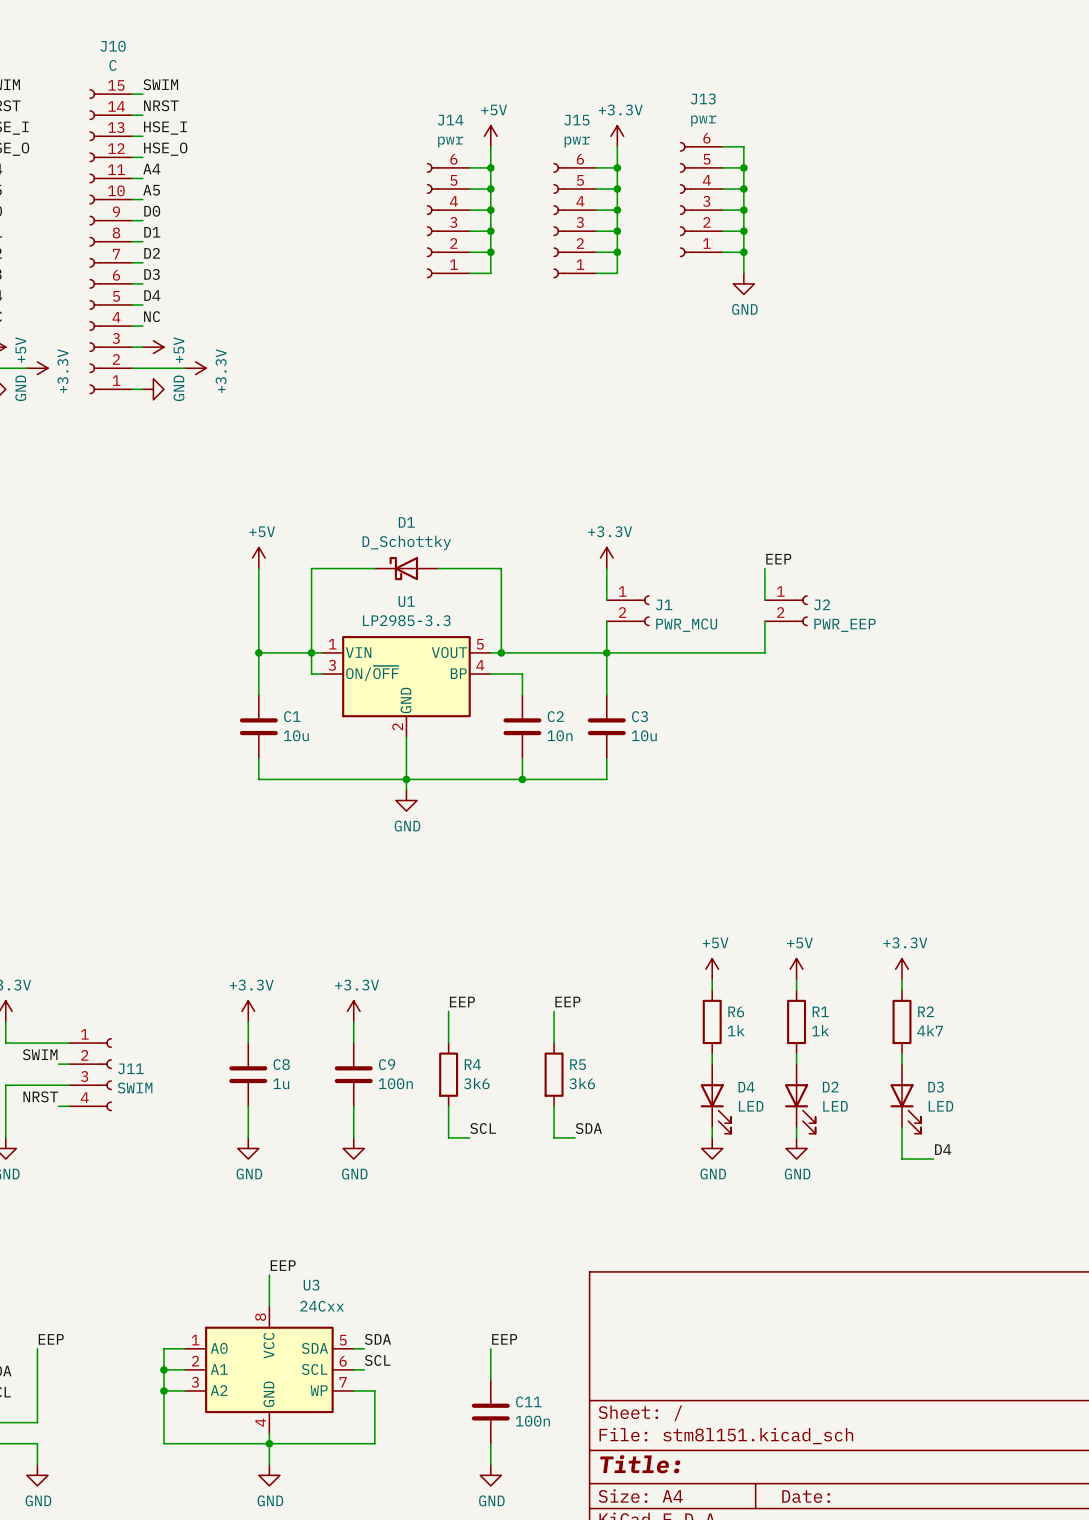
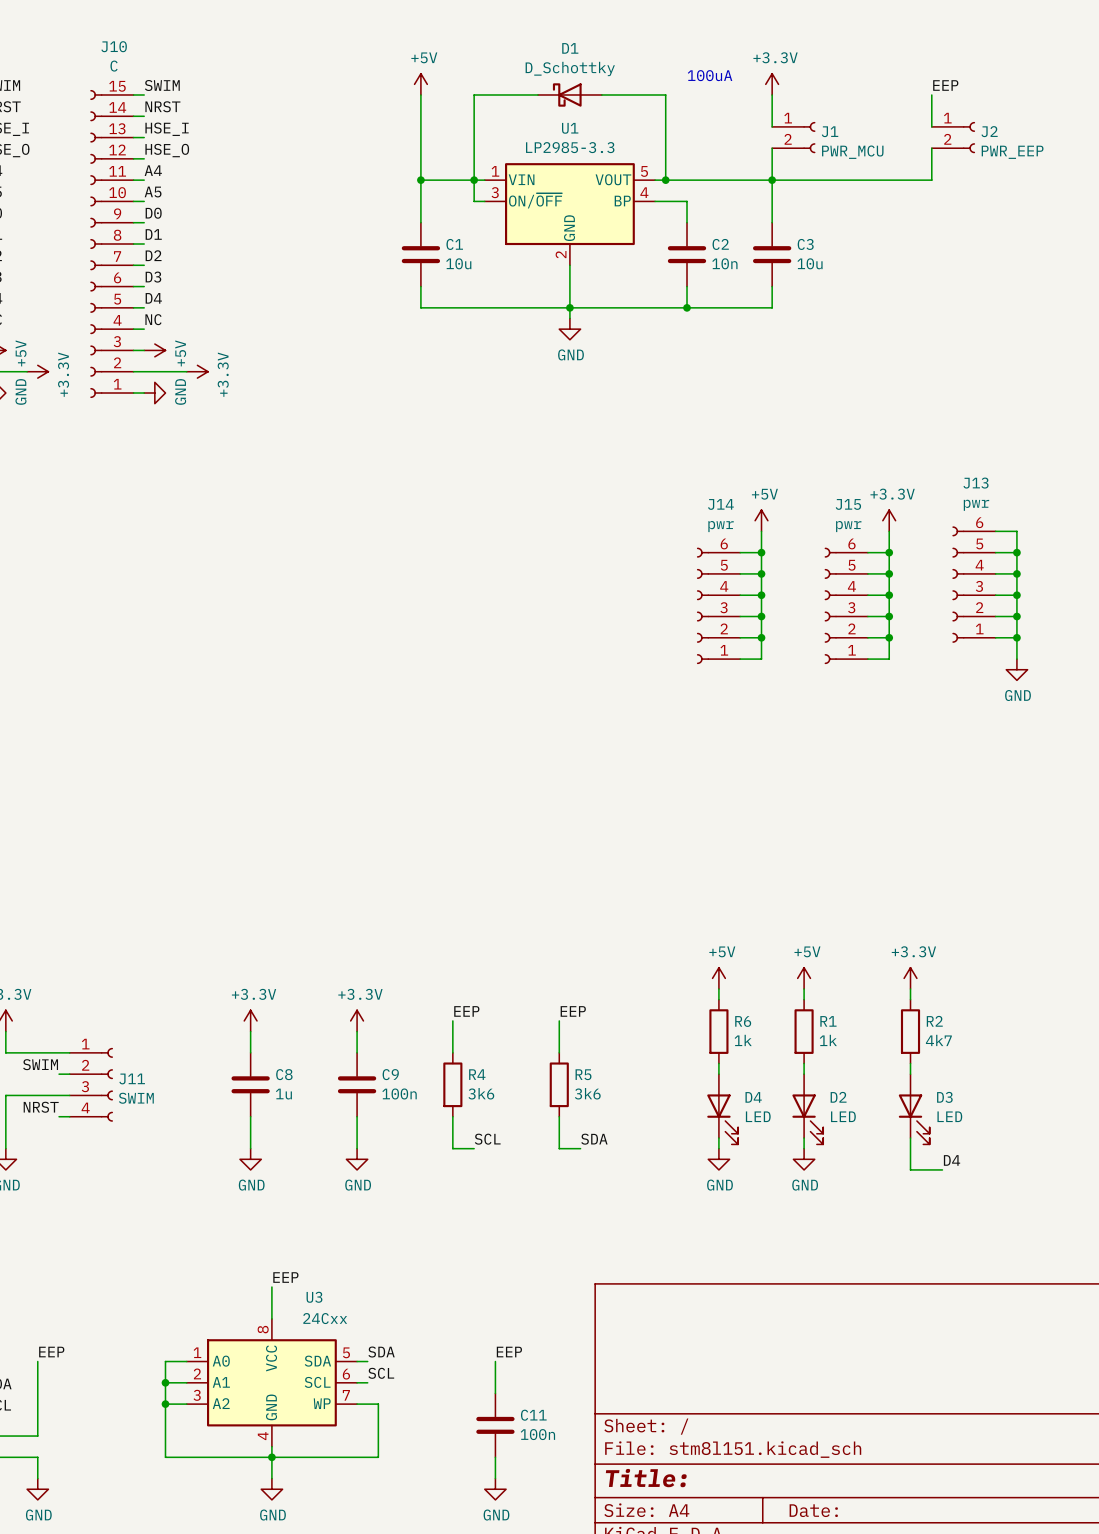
text: none -> 100uA (710, 75)
label: none -> EEP (945, 85)
wire: none -> (420, 94) (420, 222)
wire: none -> (538, 94) (474, 94) (474, 201) (484, 201)
wire: none -> (601, 94) (665, 94) (665, 180)
wire: none -> (772, 94) (772, 126)
wire: none -> (931, 94) (931, 126)
power symbol position: +5V (490, 136) -> +5V (420, 84)
power symbol position: +3.3V (617, 136) -> +3.3V (772, 84)
wire: (490, 146) (490, 273) (469, 273) -> none
wire: (617, 146) (617, 273) (596, 273) -> none
wire: (722, 146) (743, 146) (743, 273) -> none
wire: none -> (772, 148) (772, 222)
wire: none -> (931, 148) (931, 180) (655, 180)
wire: (469, 167) (490, 167) -> none
junction: (490, 167) -> none
junction: (617, 167) -> none
wire: (722, 167) (743, 167) -> none
junction: (743, 167) -> none
wire: none -> (420, 180) (484, 180)
junction: none -> (420, 180)
junction: none -> (474, 180)
junction: none -> (665, 180)
junction: none -> (772, 180)
wire: (469, 189) (490, 189) -> none
junction: (490, 189) -> none
junction: (617, 189) -> none
wire: (722, 189) (743, 189) -> none
junction: (743, 189) -> none
wire: none -> (655, 201) (687, 201) (687, 222)
J13 position: (701, 199) -> (974, 584)
wire: (469, 210) (490, 210) -> none
junction: (490, 210) -> none
junction: (617, 210) -> none
wire: (722, 210) (743, 210) -> none
junction: (743, 210) -> none
J14 position: (448, 220) -> (718, 605)
J15 position: (574, 220) -> (846, 605)
wire: (469, 231) (490, 231) -> none
junction: (490, 231) -> none
junction: (617, 231) -> none
wire: (722, 231) (743, 231) -> none
junction: (743, 231) -> none
wire: (469, 252) (490, 252) -> none
junction: (490, 252) -> none
wire: (596, 252) (617, 252) -> none
junction: (617, 252) -> none
wire: (722, 252) (743, 252) -> none
junction: (743, 252) -> none
wire: none -> (569, 265) (569, 318)
wire: none -> (420, 286) (420, 307) (772, 307) (772, 286)
wire: none -> (687, 286) (687, 307)
power symbol position: GND (743, 283) -> GND (569, 329)
junction: none -> (569, 307)
junction: none -> (687, 307)
power symbol: none -> +5V (761, 520)
power symbol: none -> +3.3V (889, 520)
wire: none -> (889, 531) (889, 659) (867, 659)
wire: none -> (995, 531) (1016, 531) (1016, 659)
wire: none -> (740, 552) (761, 552)
junction: none -> (761, 552)
wire: none -> (867, 552) (889, 552)
junction: none -> (889, 552)
wire: none -> (995, 552) (1016, 552)
junction: none -> (1016, 552)
power symbol: +5V (258, 558) -> none
power symbol: +3.3V (606, 558) -> none
label: EEP (778, 559) -> none
wire: (258, 568) (258, 695) -> none
wire: (374, 568) (311, 568) (311, 674) (322, 674) -> none
D1 position: (406, 568) -> (569, 94)
wire: (438, 568) (501, 568) (501, 652) -> none
wire: (606, 568) (606, 600) -> none
wire: none -> (740, 573) (761, 573)
junction: none -> (761, 573)
wire: (764, 568) (764, 600) -> none
wire: none -> (867, 573) (889, 573)
junction: none -> (889, 573)
wire: none -> (995, 573) (1016, 573)
junction: none -> (1016, 573)
wire: none -> (740, 595) (761, 595)
junction: none -> (761, 595)
wire: none -> (867, 595) (889, 595)
junction: none -> (889, 595)
wire: none -> (995, 595) (1016, 595)
junction: none -> (1016, 595)
J1 position: (628, 610) -> (793, 137)
wire: none -> (740, 616) (761, 616)
junction: none -> (761, 616)
J2 position: (786, 610) -> (953, 137)
wire: none -> (867, 616) (889, 616)
junction: none -> (889, 616)
wire: none -> (995, 616) (1016, 616)
junction: none -> (1016, 616)
wire: (606, 621) (606, 695) -> none
wire: (764, 621) (764, 652) (754, 652) -> (761, 531) (761, 659)
wire: none -> (740, 637) (761, 637)
junction: none -> (761, 637)
wire: none -> (867, 637) (889, 637)
junction: none -> (889, 637)
wire: none -> (995, 637) (1016, 637)
junction: none -> (1016, 637)
wire: (258, 652) (322, 652) -> none
junction: (258, 652) -> none
junction: (311, 652) -> none
wire: (490, 652) (733, 652) -> none
junction: (501, 652) -> none
junction: (606, 652) -> none
power symbol: none -> GND (1016, 669)
wire: (490, 674) (522, 674) (522, 695) -> none
U1 position: (406, 686) -> (569, 214)
C1 position: (258, 726) -> (420, 254)
C2 position: (522, 726) -> (687, 254)
C3 position: (606, 726) -> (772, 254)
wire: (406, 737) (406, 789) -> none
wire: (258, 758) (258, 779) (606, 779) (606, 758) -> none
wire: (522, 758) (522, 779) -> none
junction: (406, 779) -> none
junction: (522, 779) -> none
power symbol: GND (406, 800) -> none

